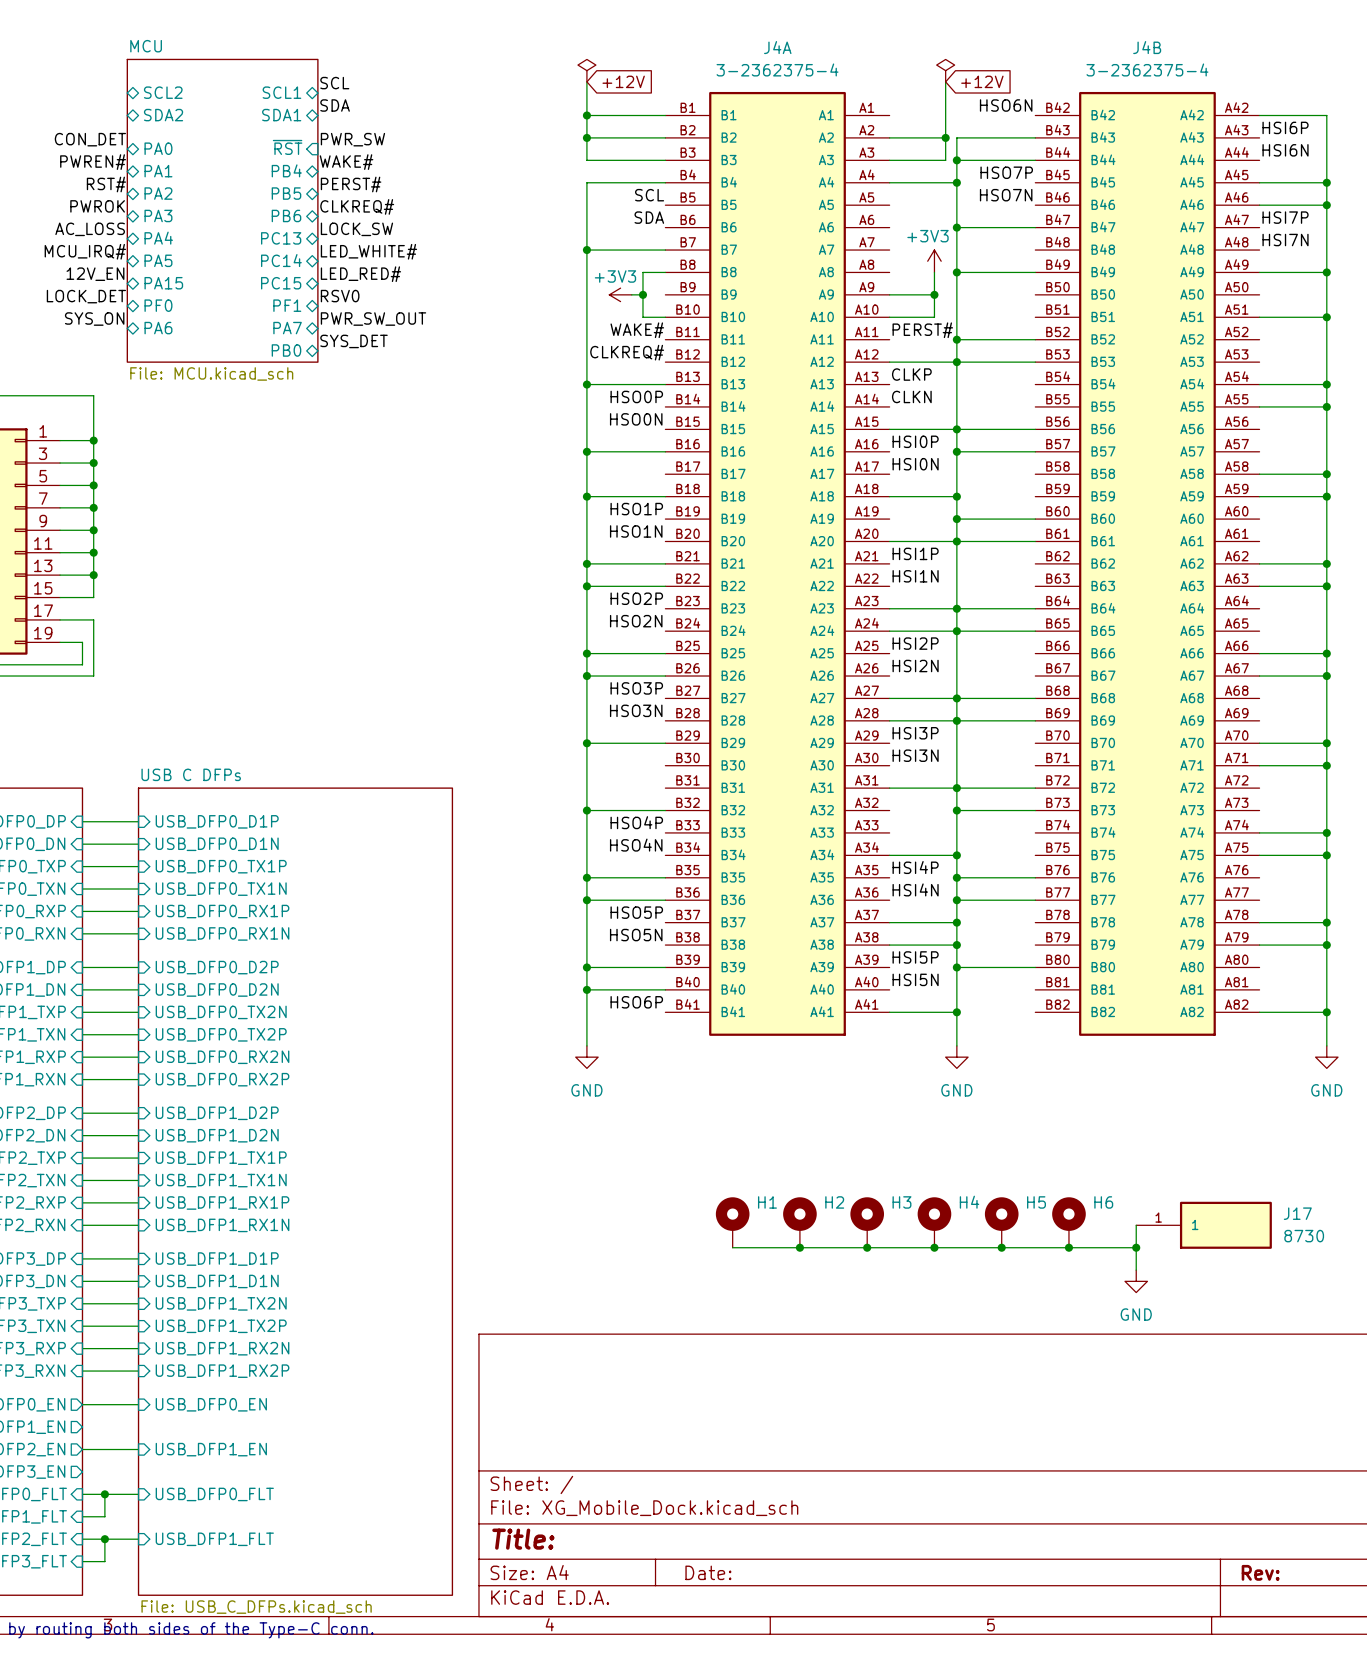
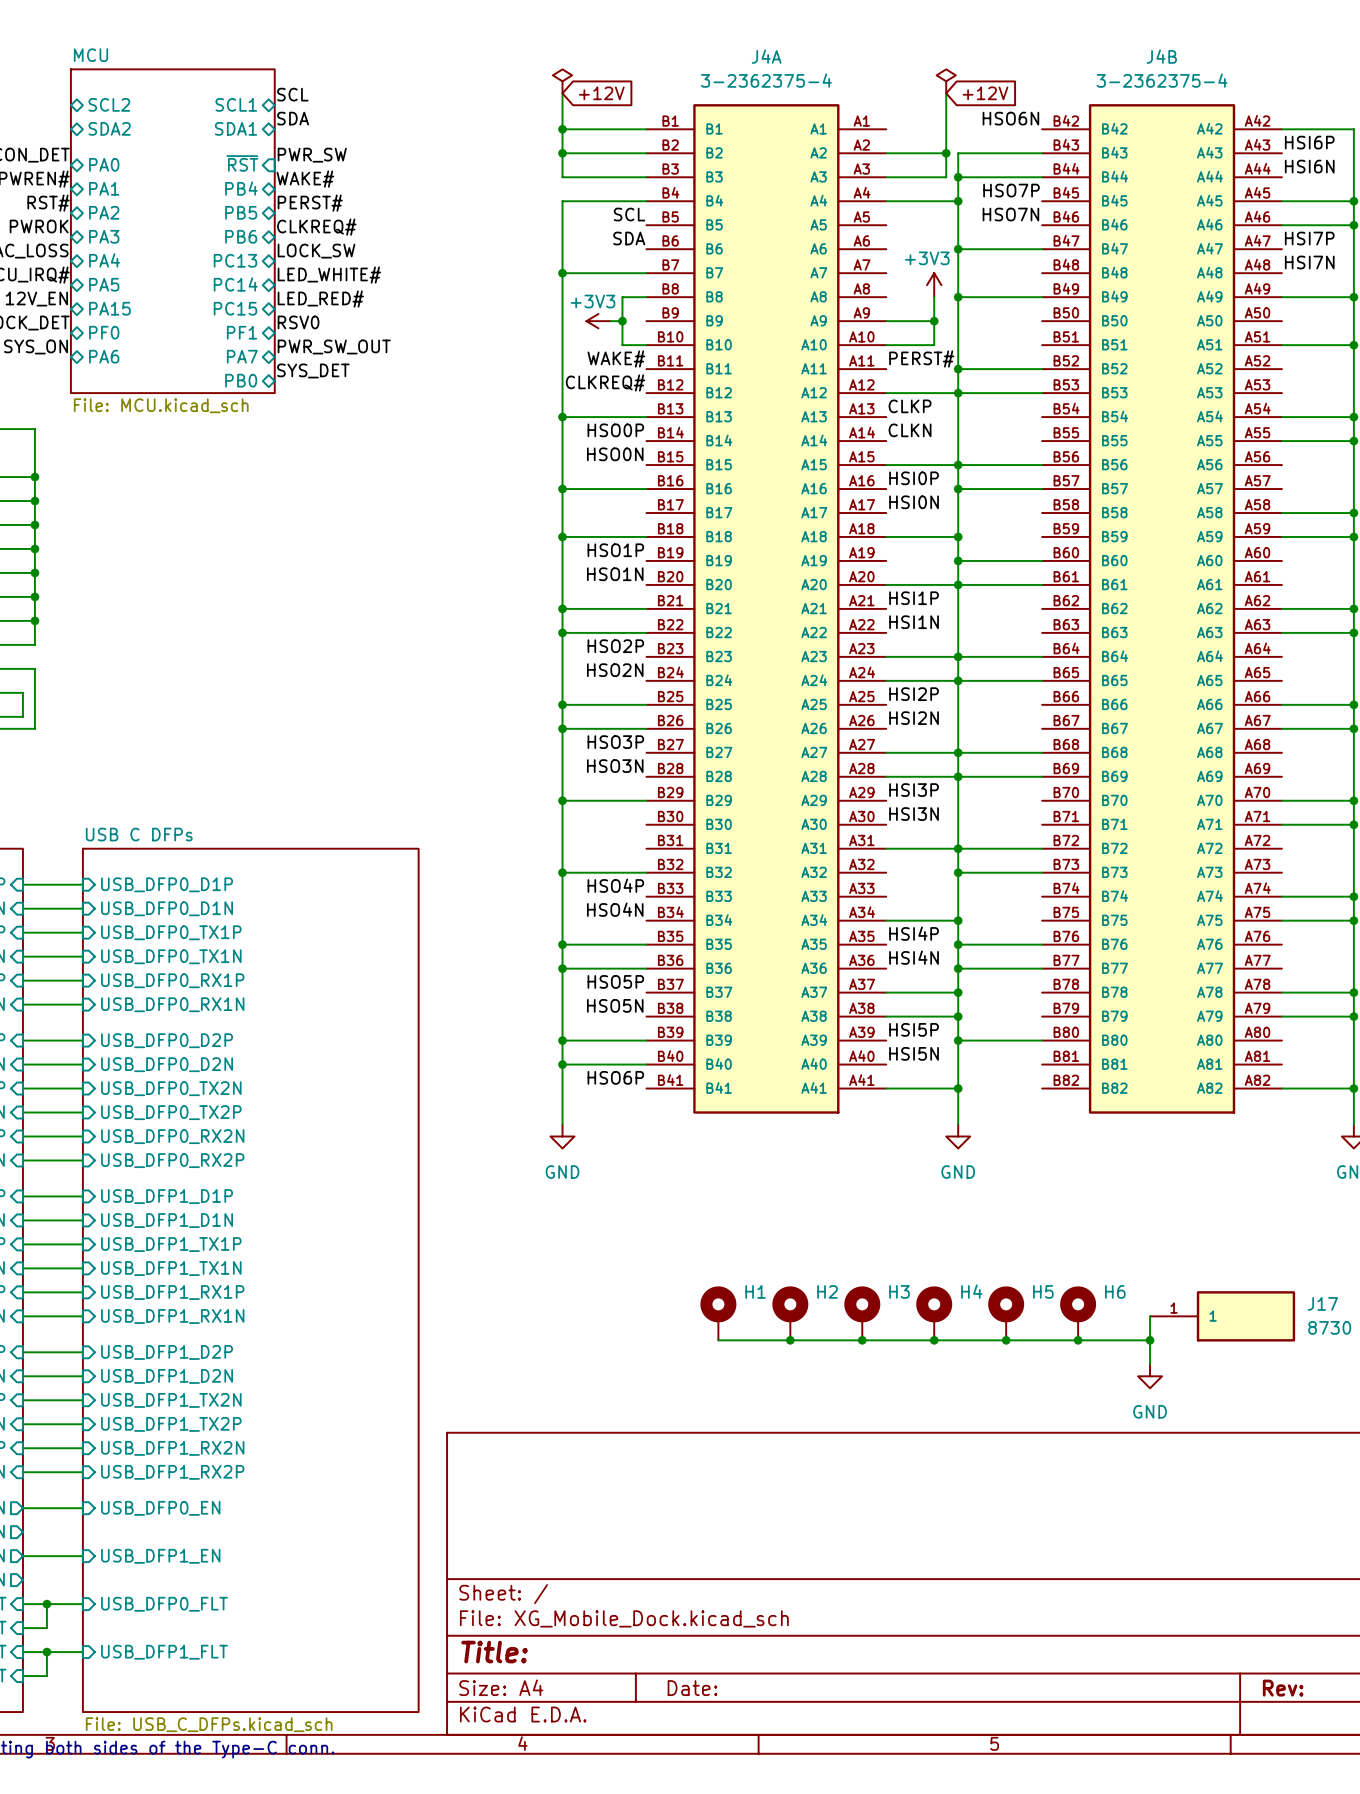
sheet pin: USB_DFP1_D2P (217, 1113) -> USB_DFP1_D1P (167, 1196)
sheet pin: USB_DFP1_D2N (217, 1135) -> USB_DFP1_D1N (167, 1220)
sheet pin: USB_DFP1_D1P (217, 1259) -> USB_DFP1_D2P (167, 1352)
sheet pin: USB_DFP1_D1N (217, 1281) -> USB_DFP1_D2N (167, 1376)

